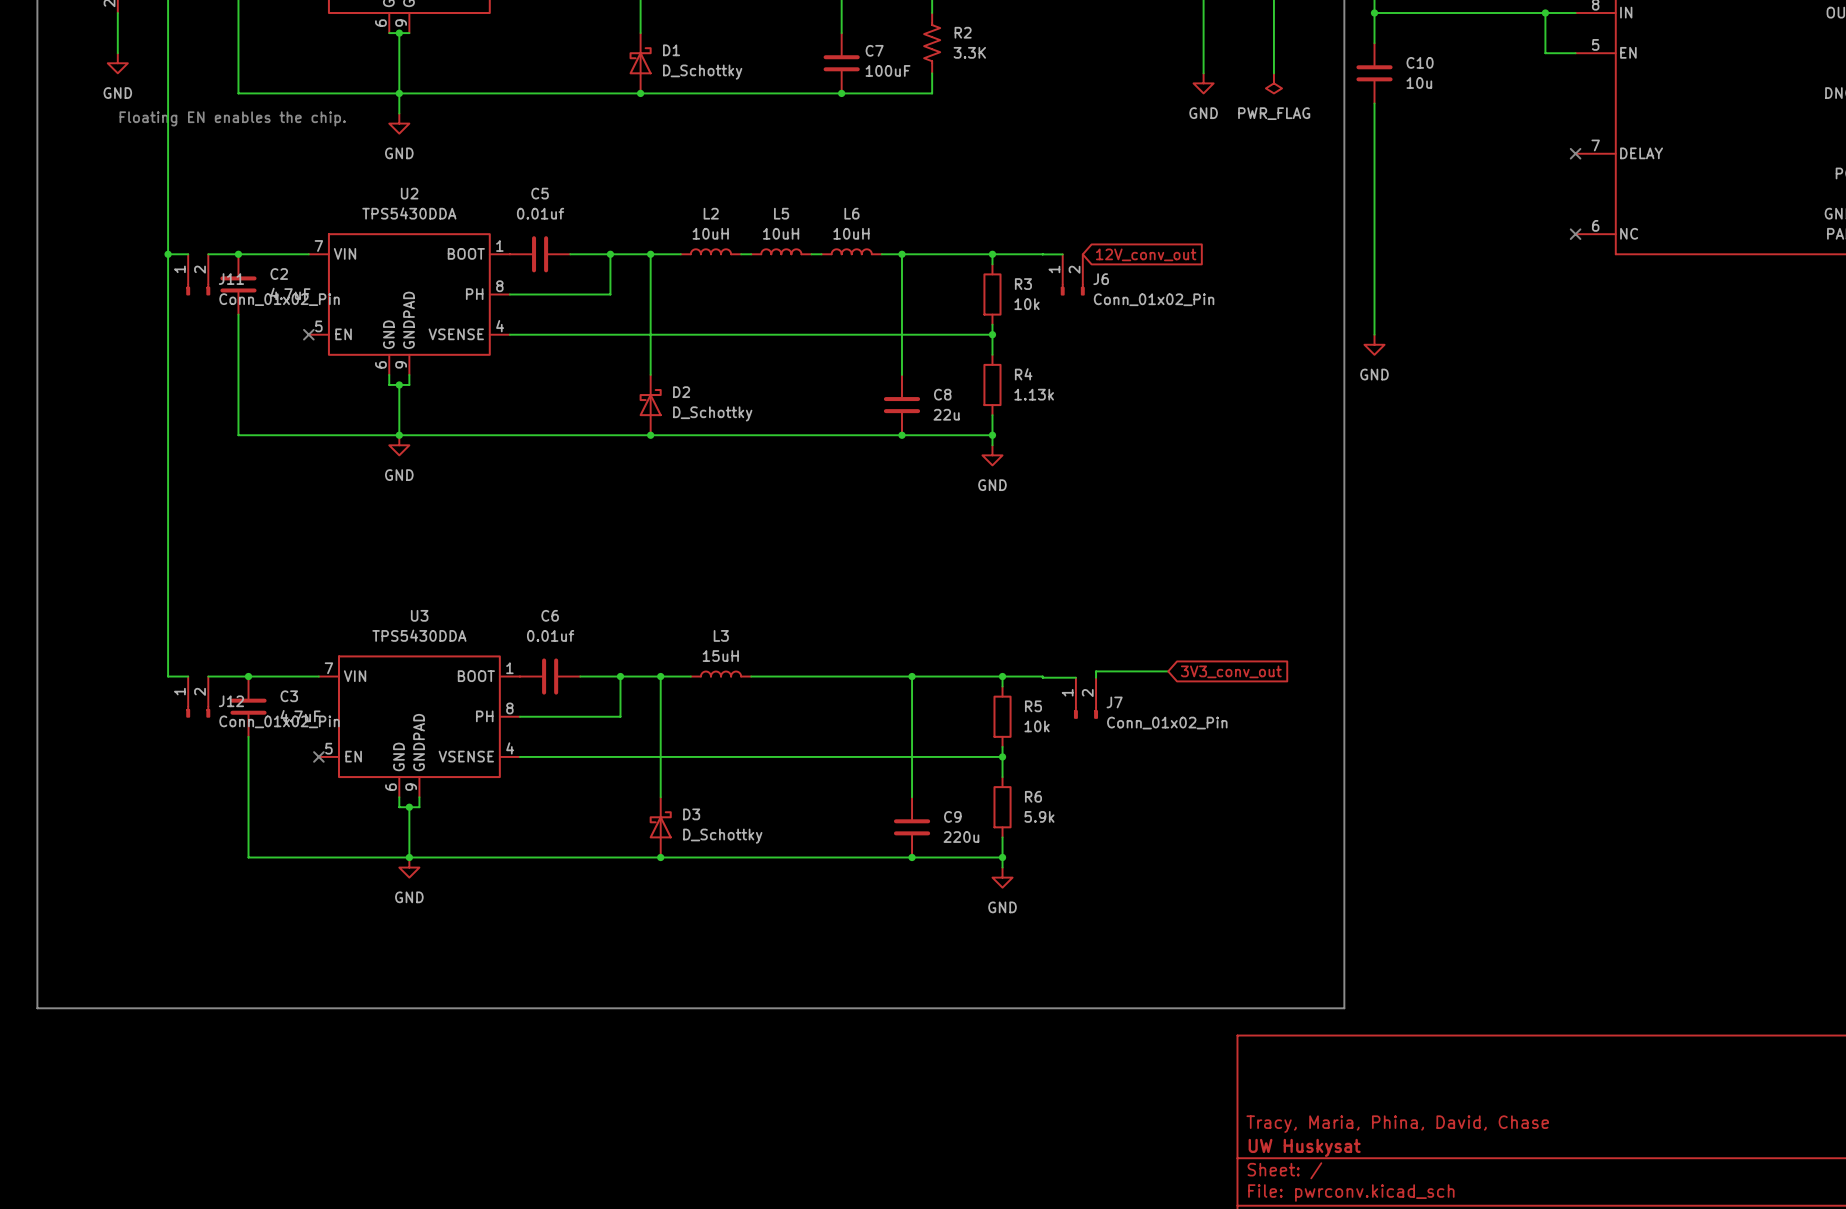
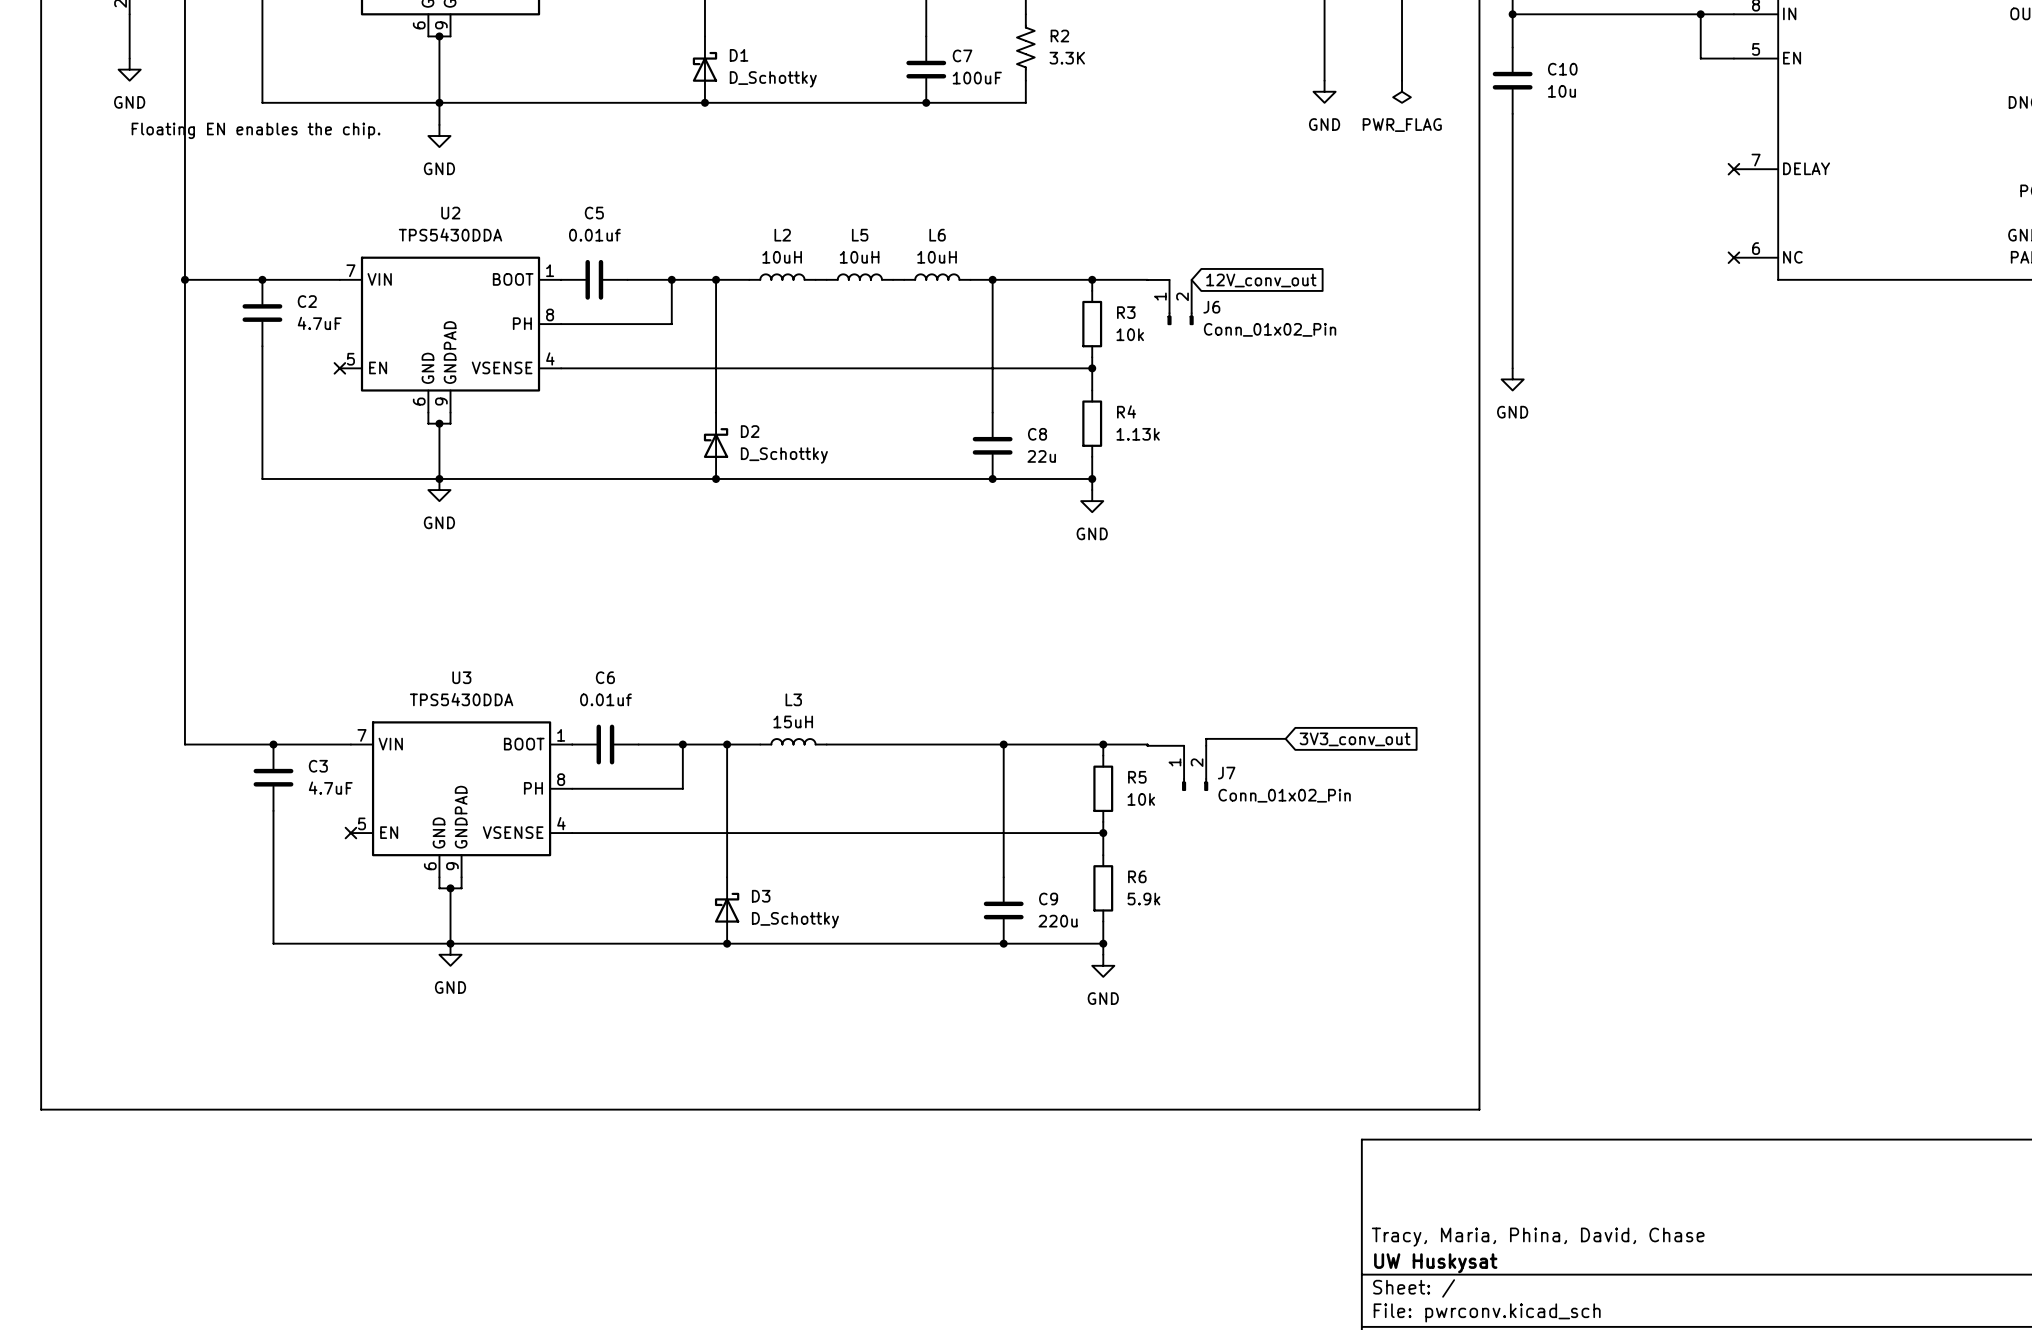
wire: none -> (207, 279) (229, 279)
J11: Conn_01x02_Pin (198, 274) -> none
wire: none -> (207, 744) (229, 744)
J12: Conn_01x02_Pin (198, 696) -> none

